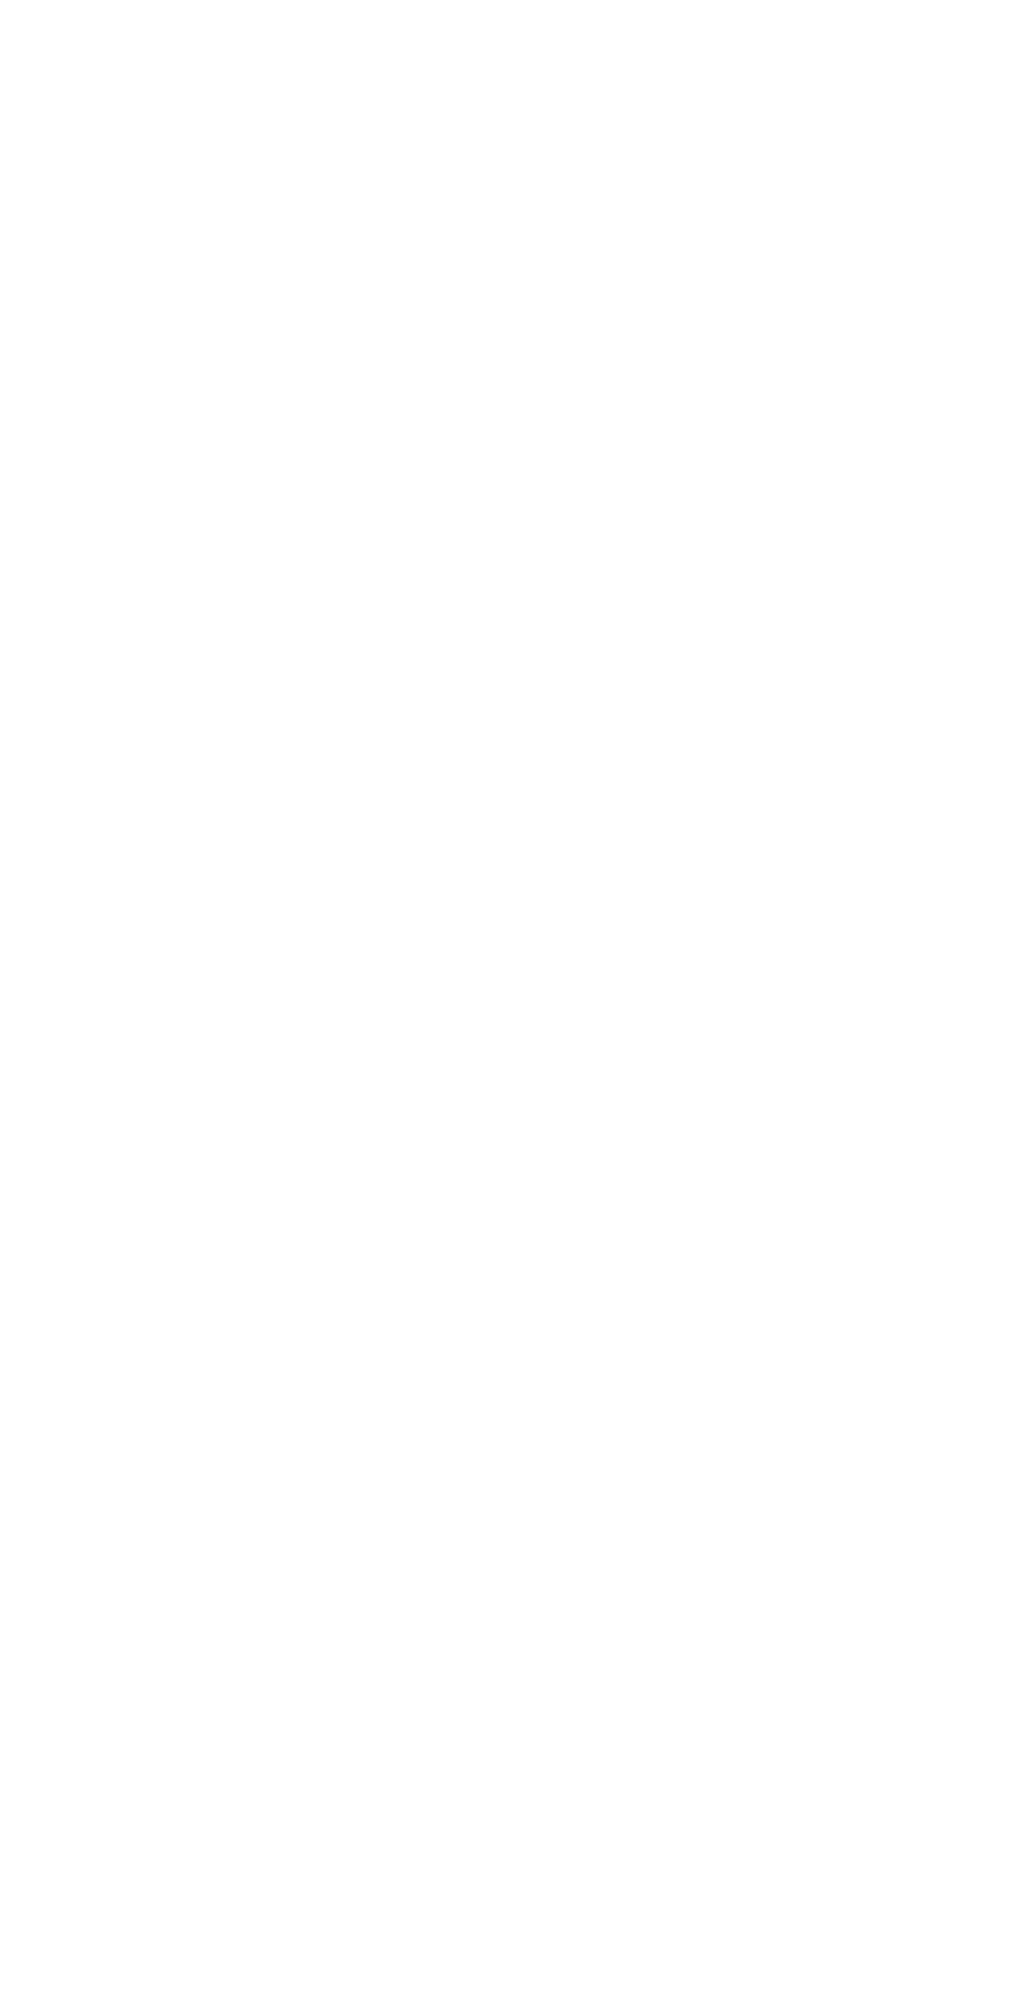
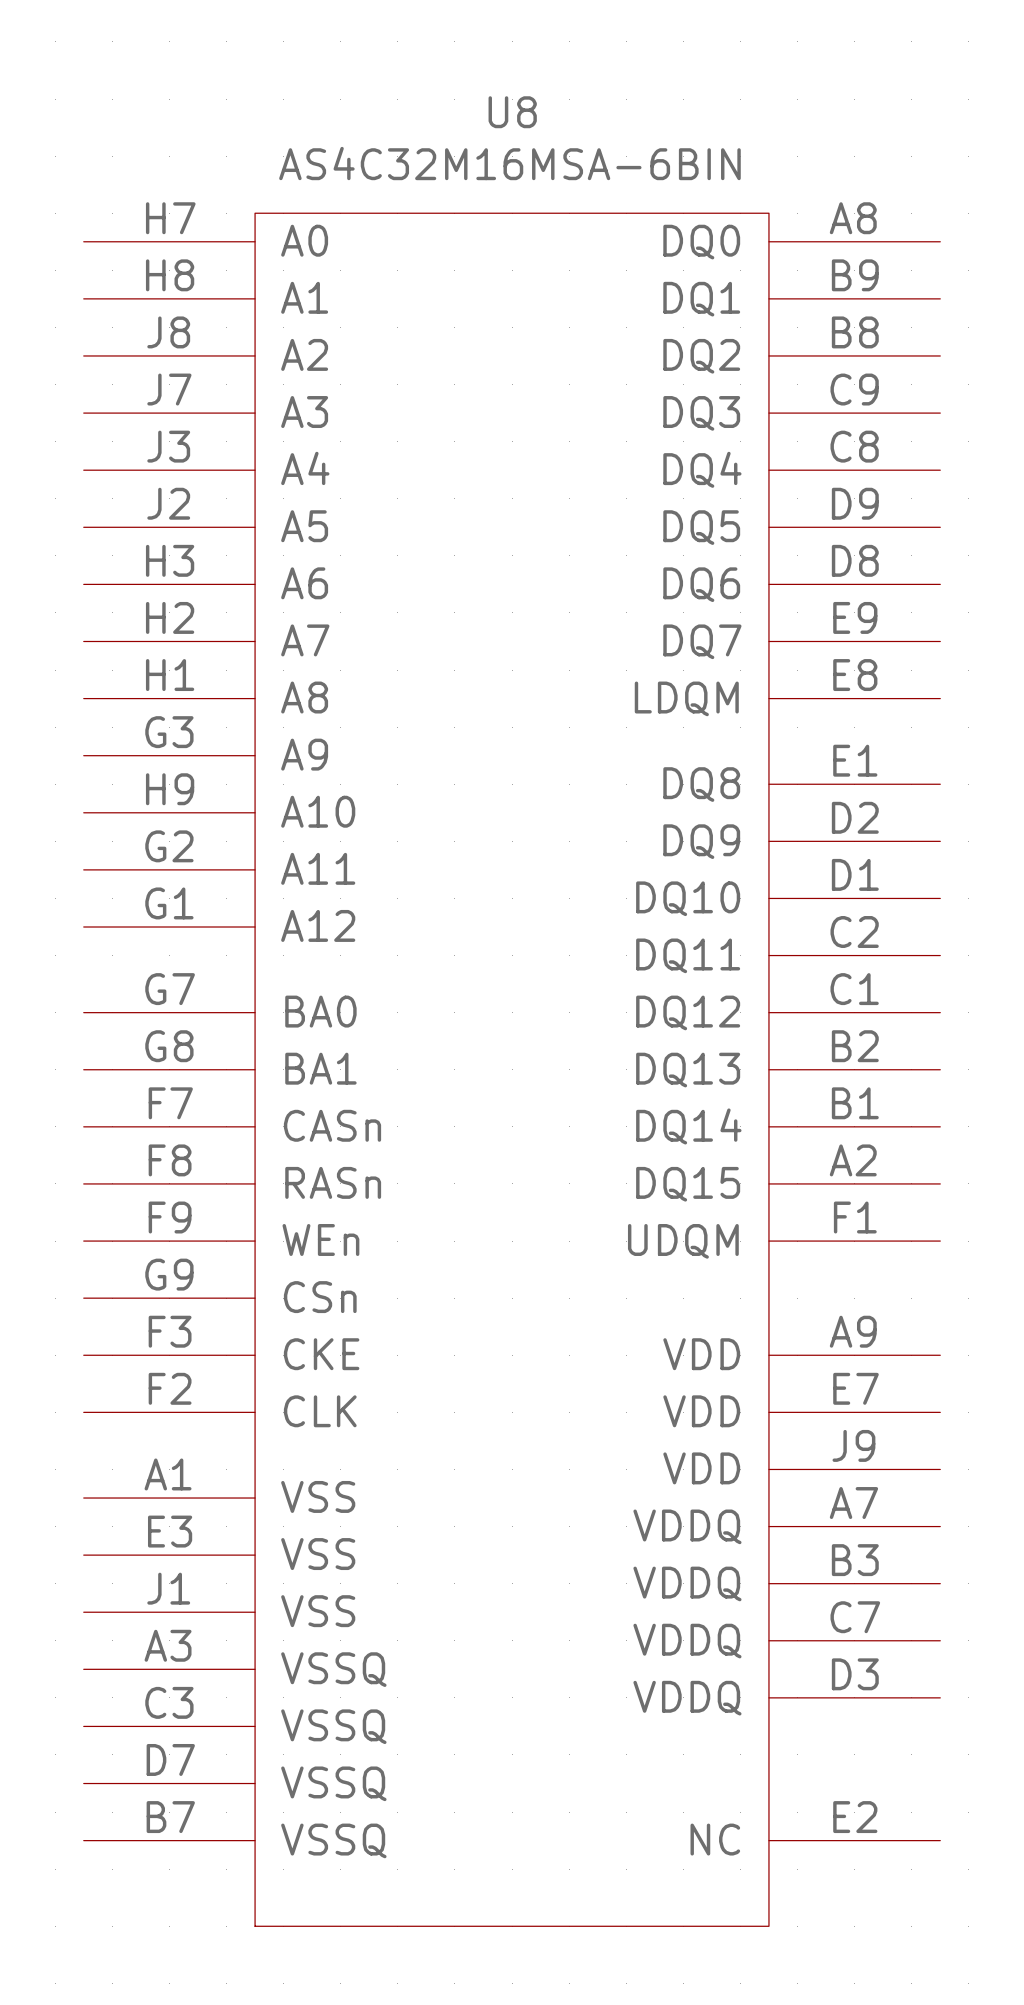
U8: none -> AS4C32M16MSA-6BIN (512, 1069)

